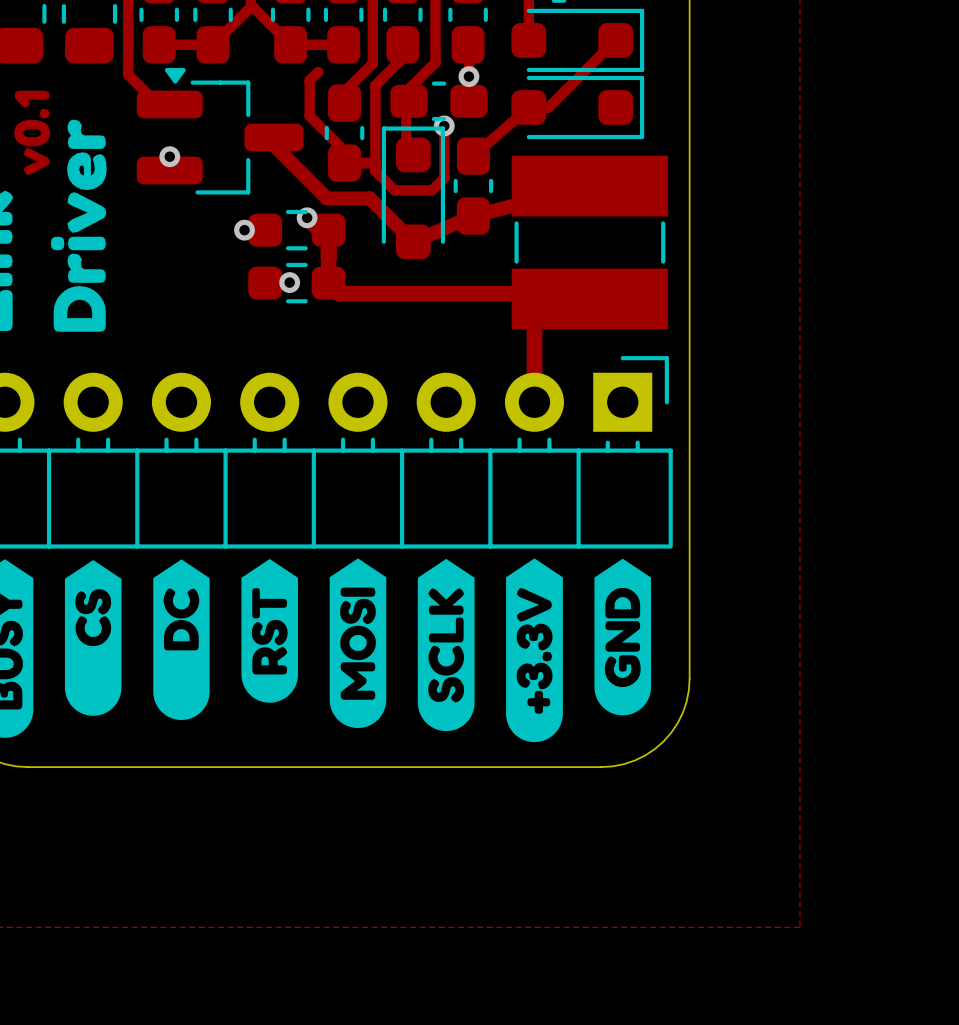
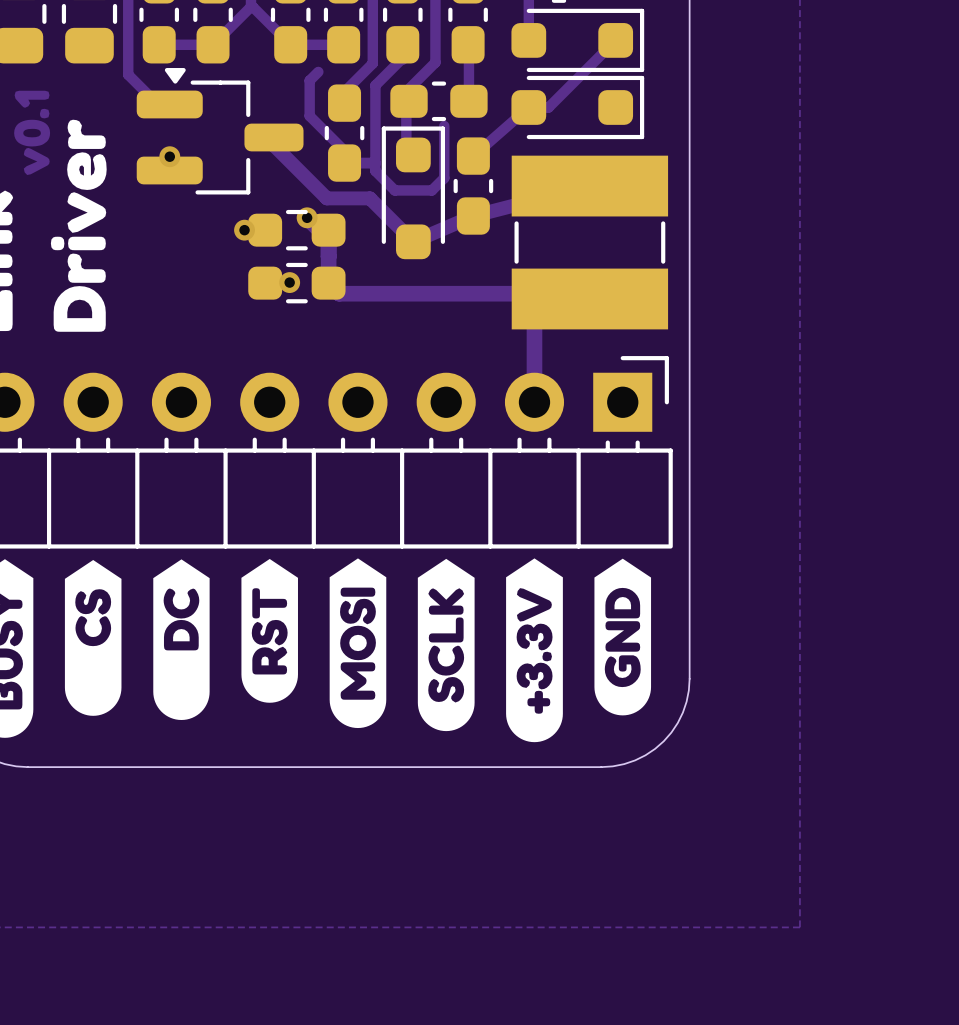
via: (468, 76) -> none
via: (444, 125) -> none

